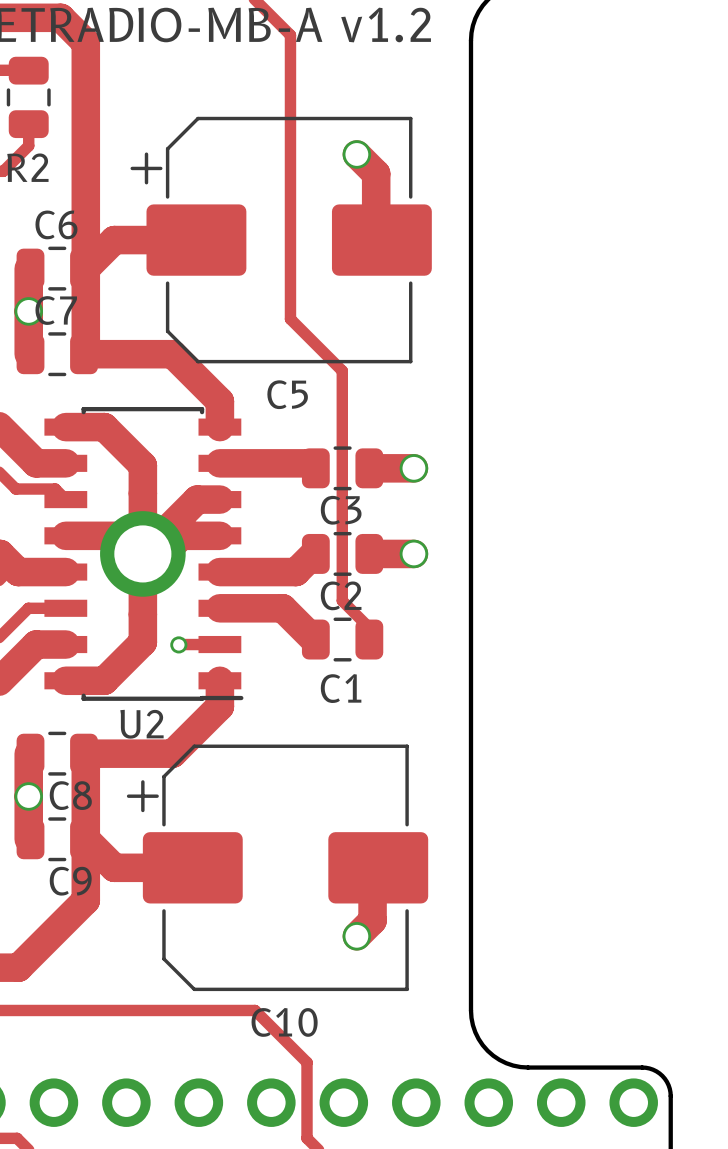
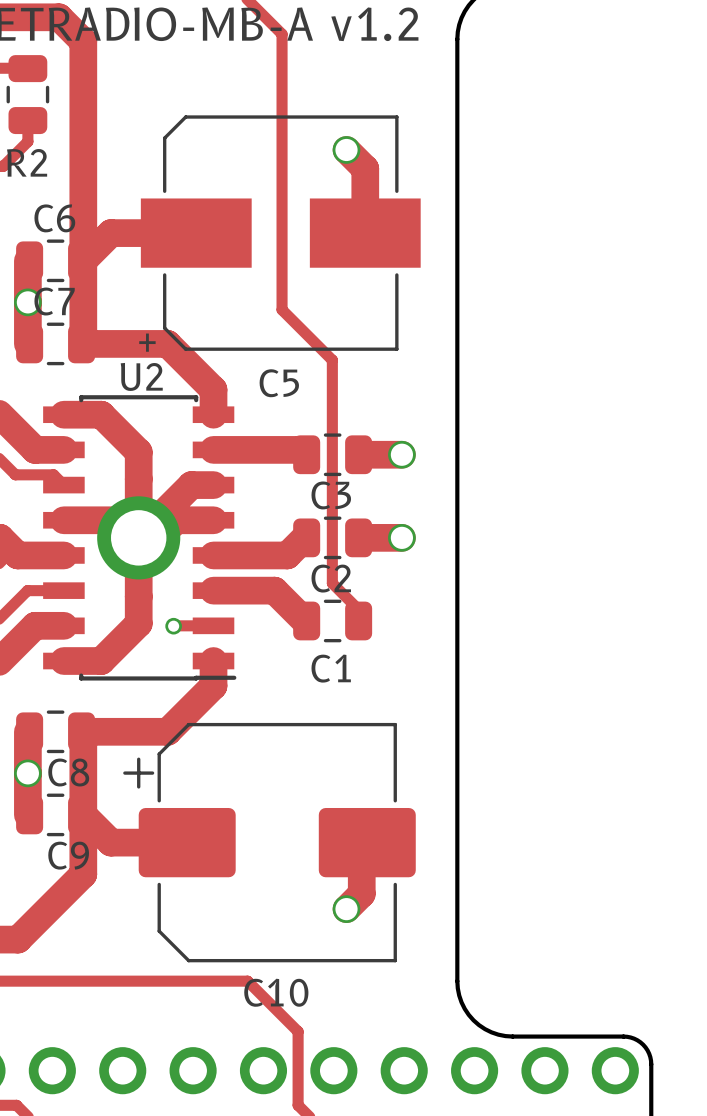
C5 footprint: [130, 116, 432, 364] -> [140, 115, 421, 351]
U2 name position: U2 (141, 724) -> U2 (141, 376)

